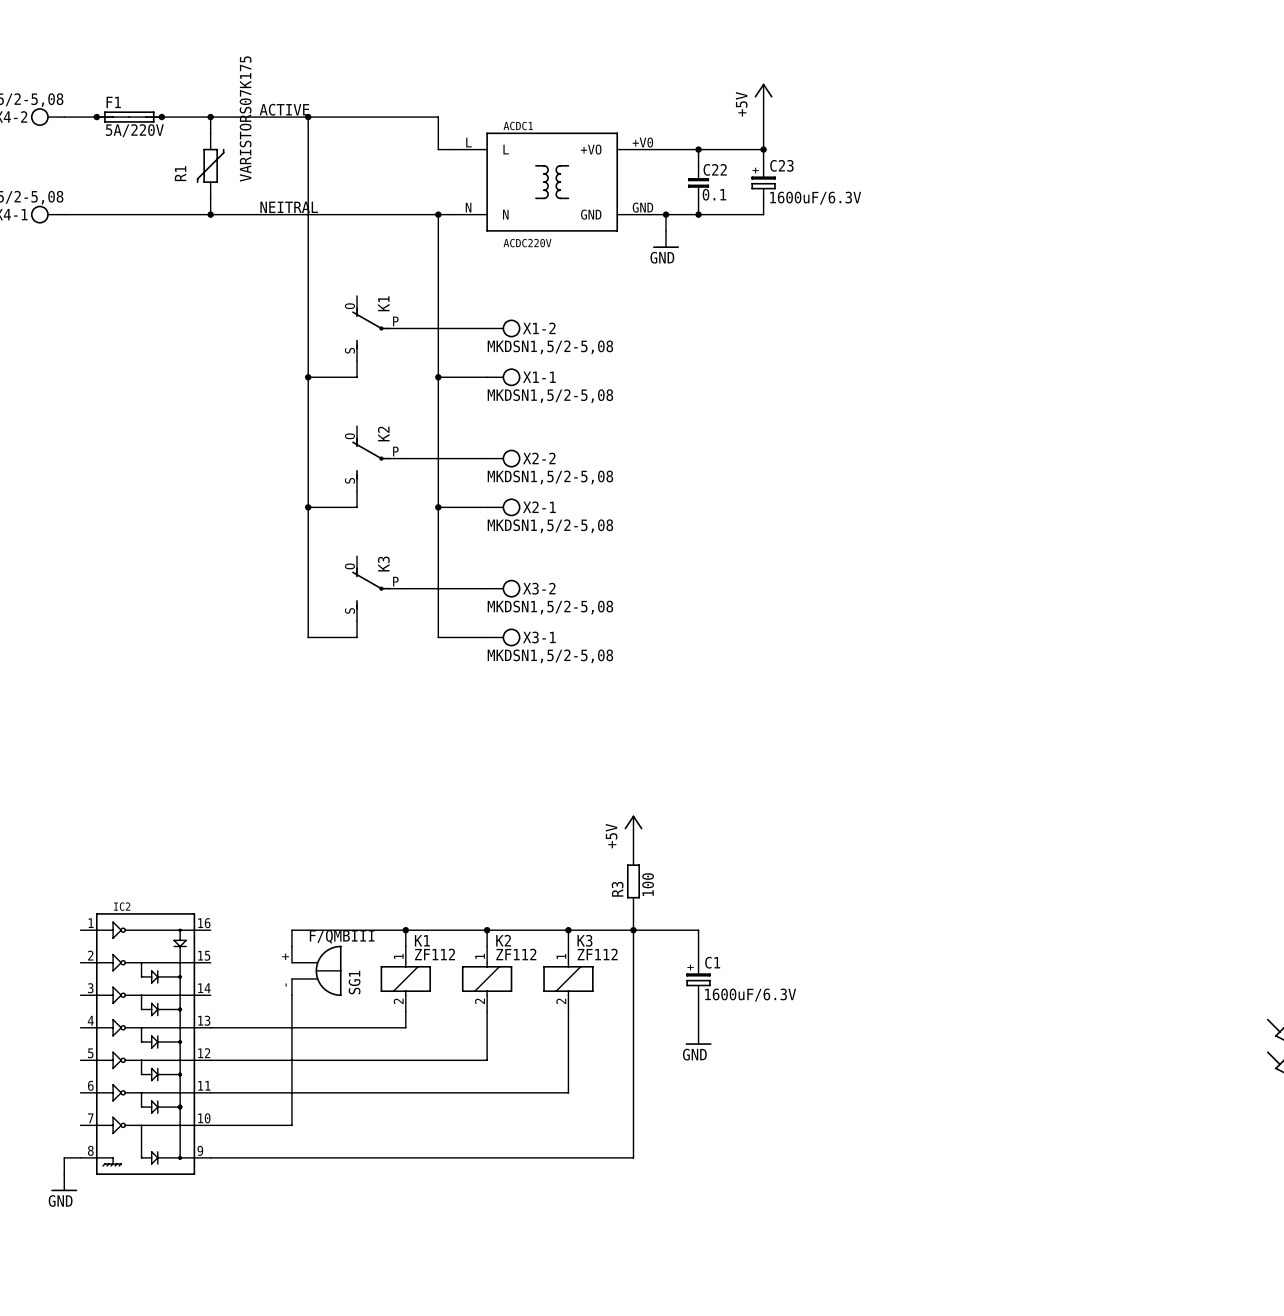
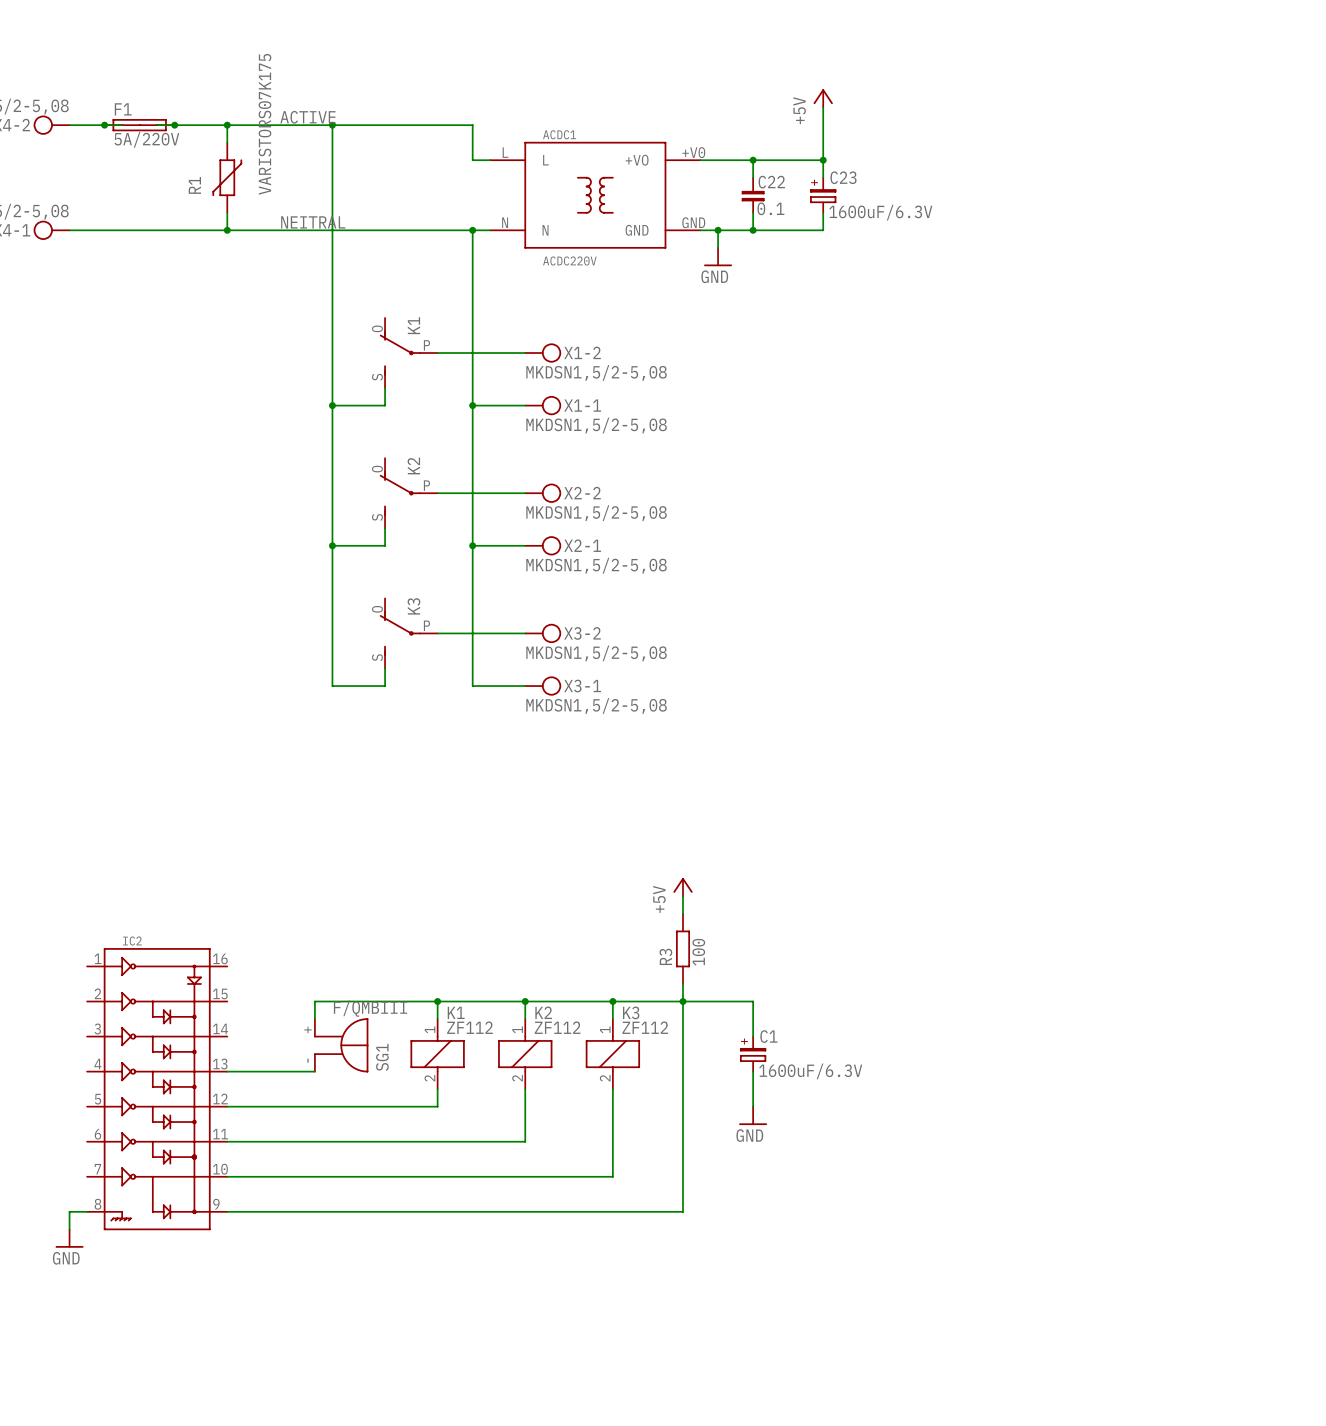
wire: (291, 995) (291, 1125) -> (314, 1071) (227, 1071)
IC2 position: (145, 1044) -> (157, 1089)
wire: (633, 1125) (633, 1157) (210, 1157) -> (683, 1211) (314, 1211)
wire: (80, 1157) (64, 1157) (64, 1174) -> (87, 1211) (69, 1211) (69, 1229)
power symbol position: GND (64, 1182) -> GND (69, 1238)

